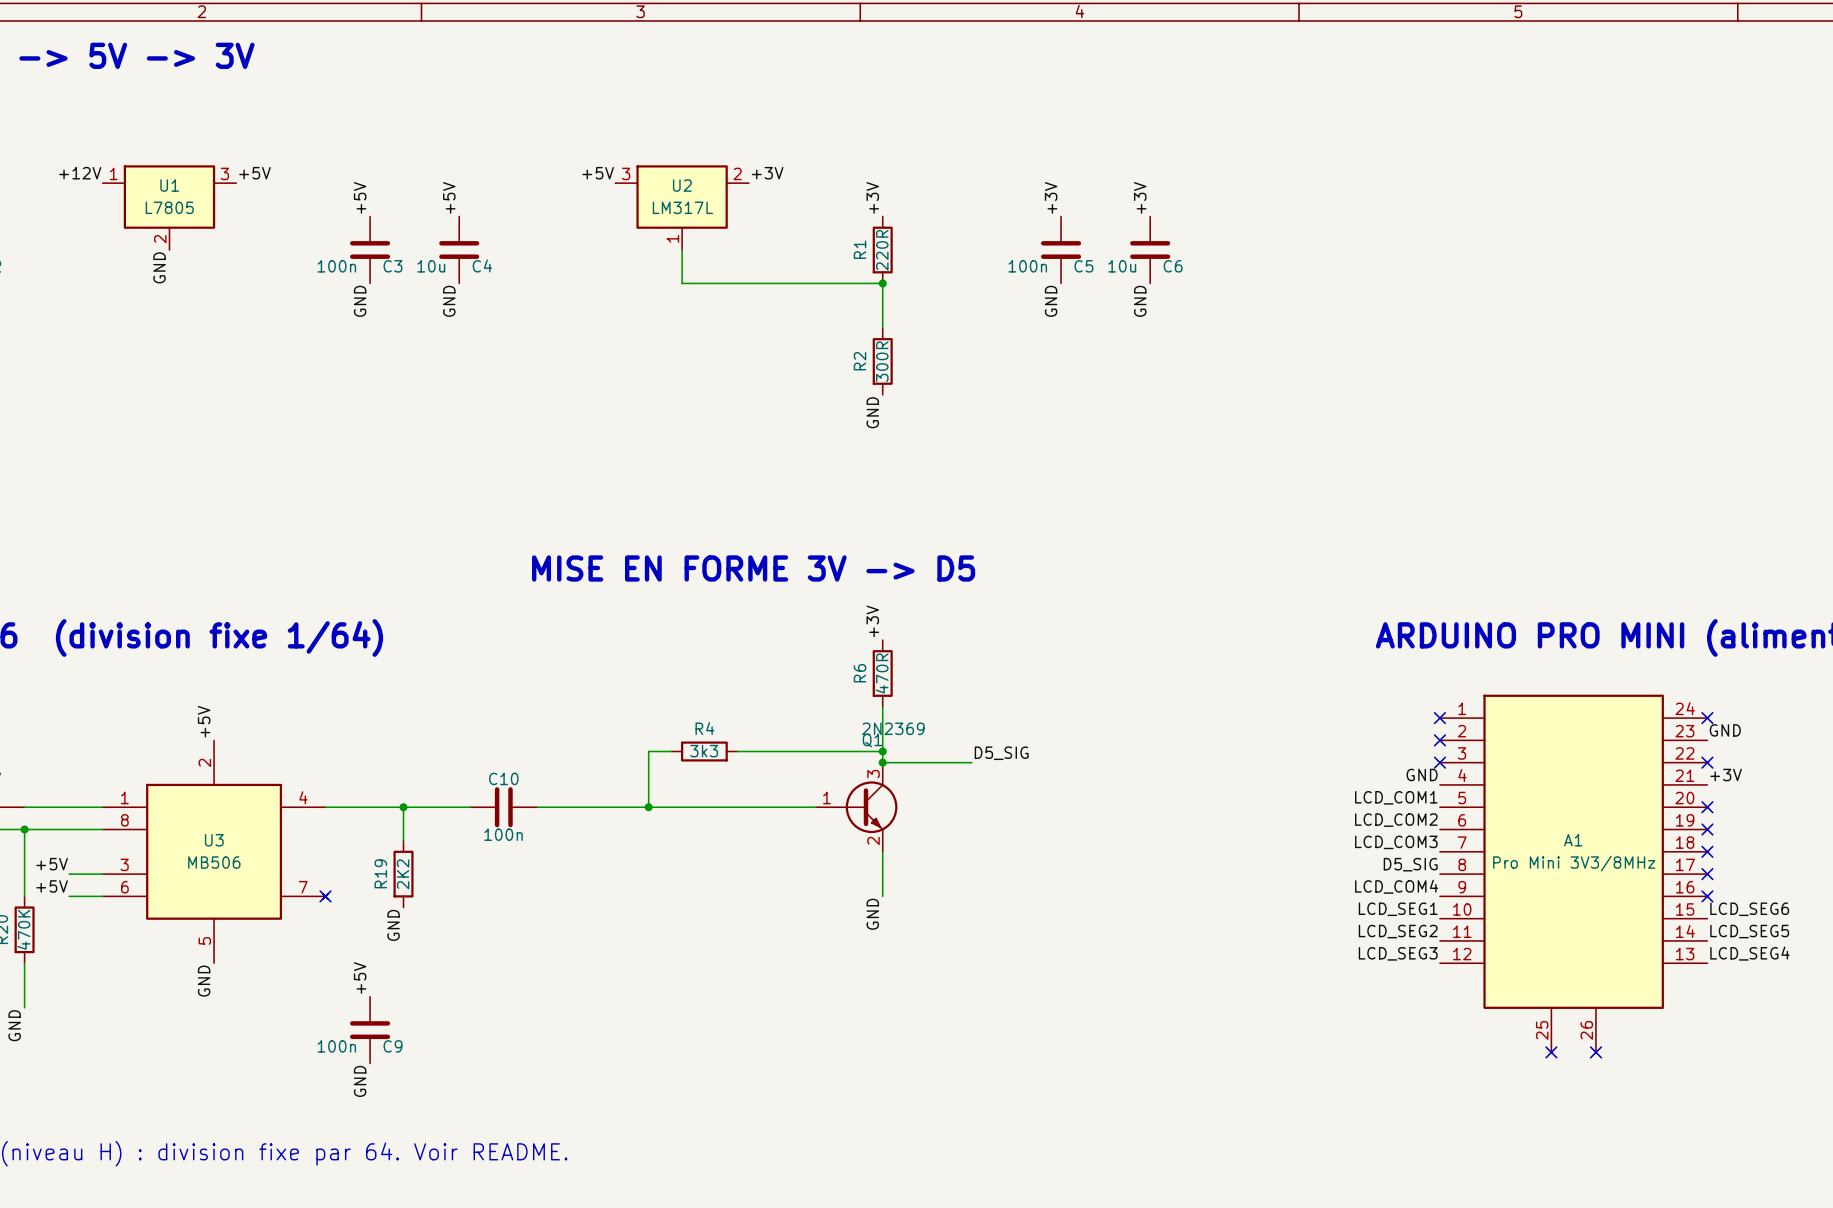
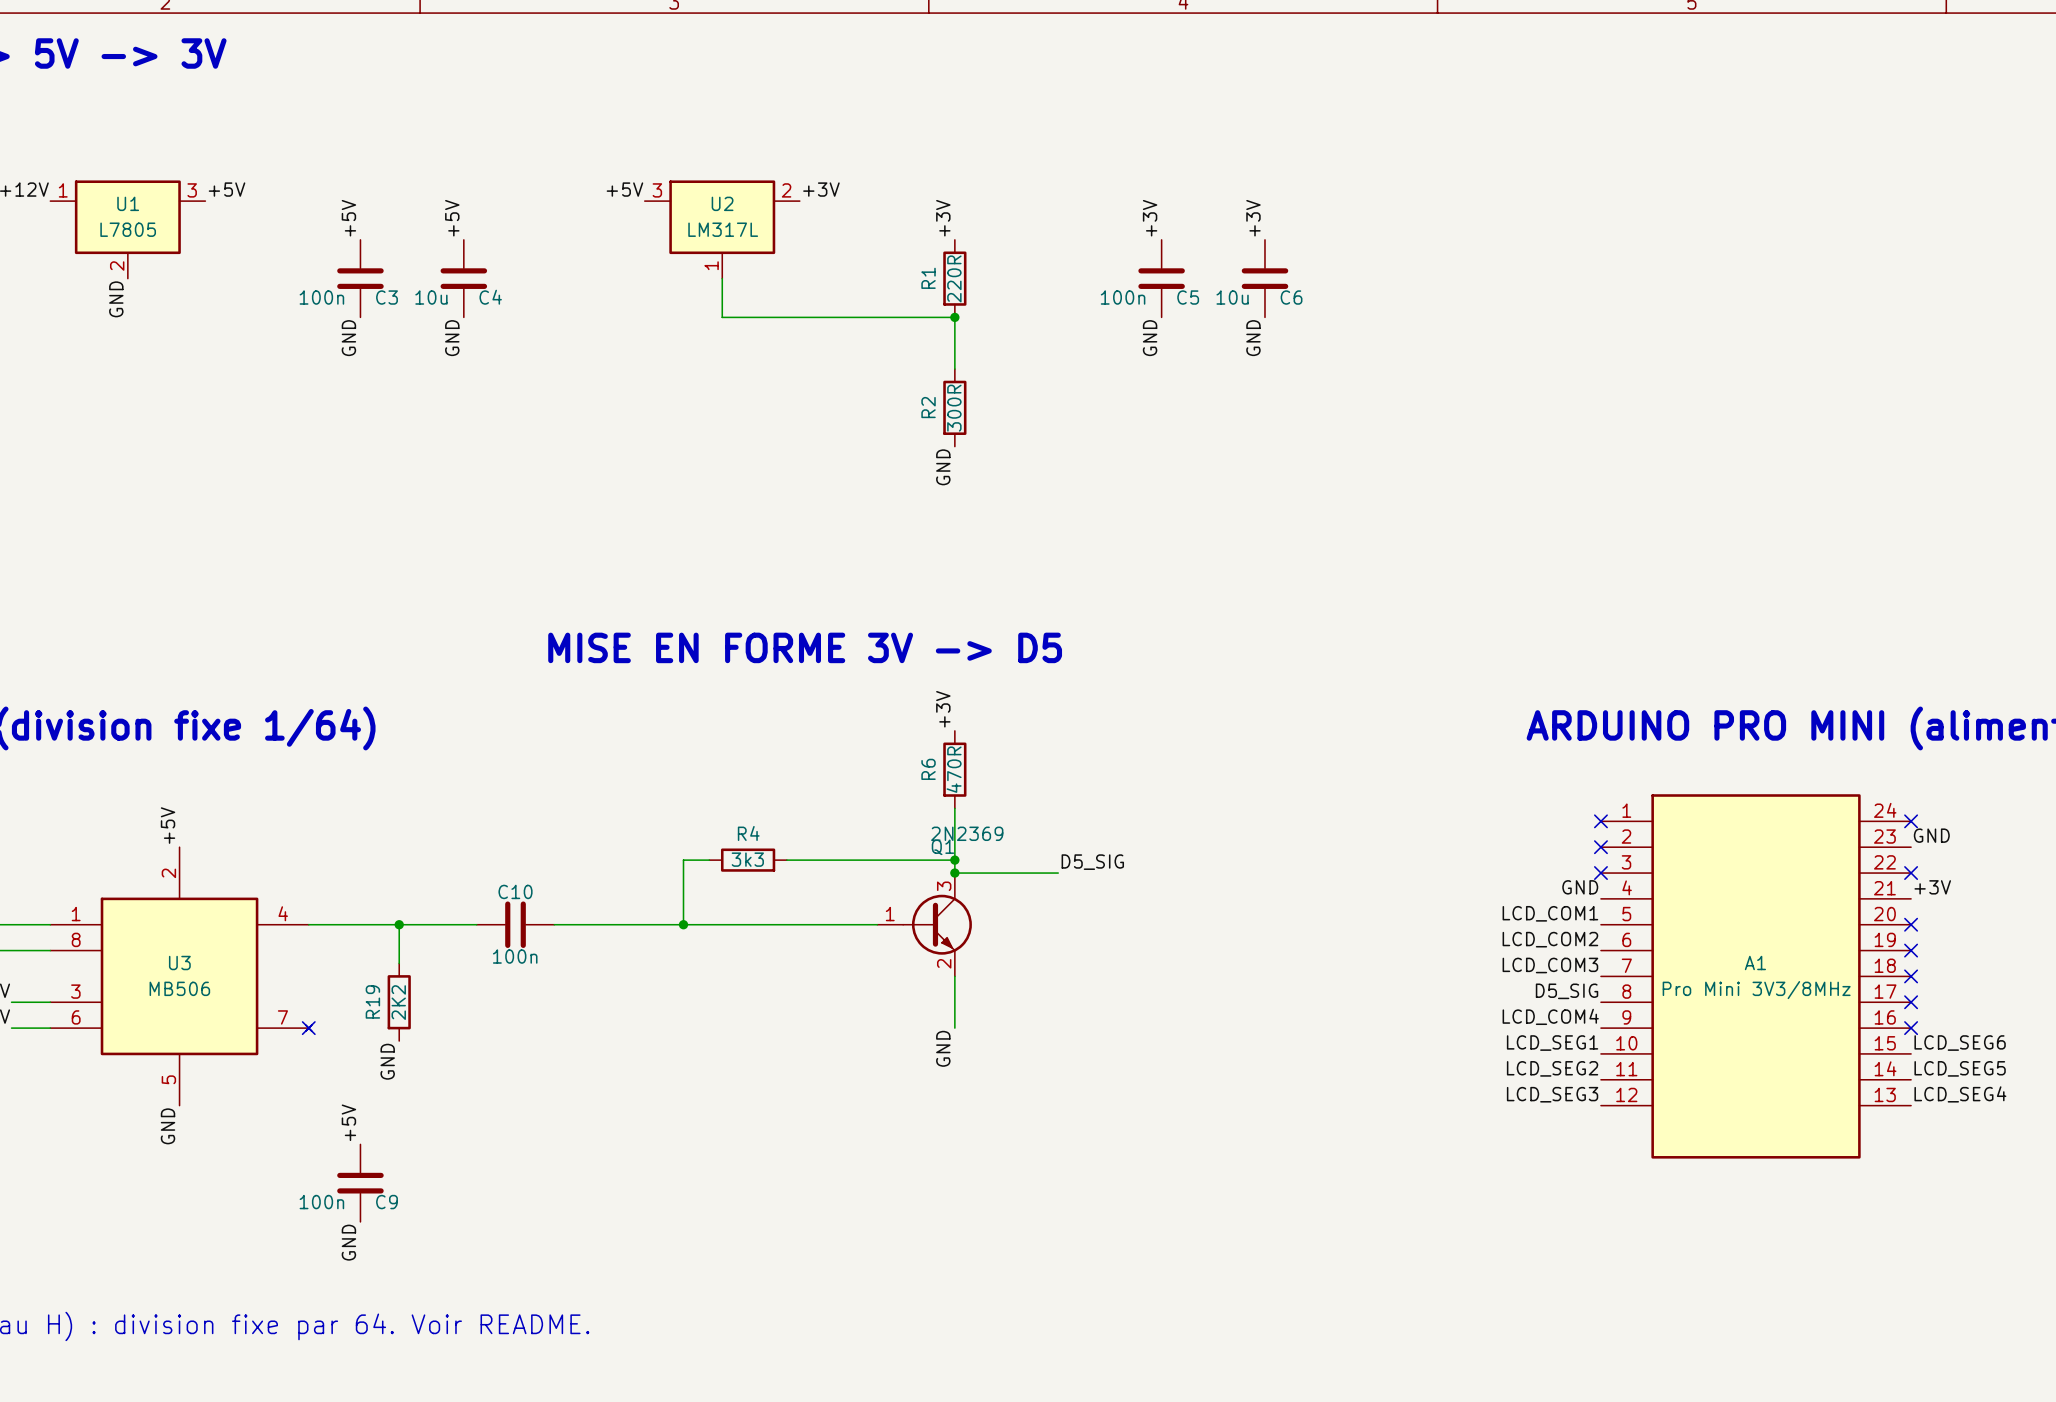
A1 symbol: [1439, 694, 1708, 1053] -> [1600, 794, 1912, 1159]
no-connect mark: (1551, 1052) -> none
no-connect mark: (1595, 1052) -> none

